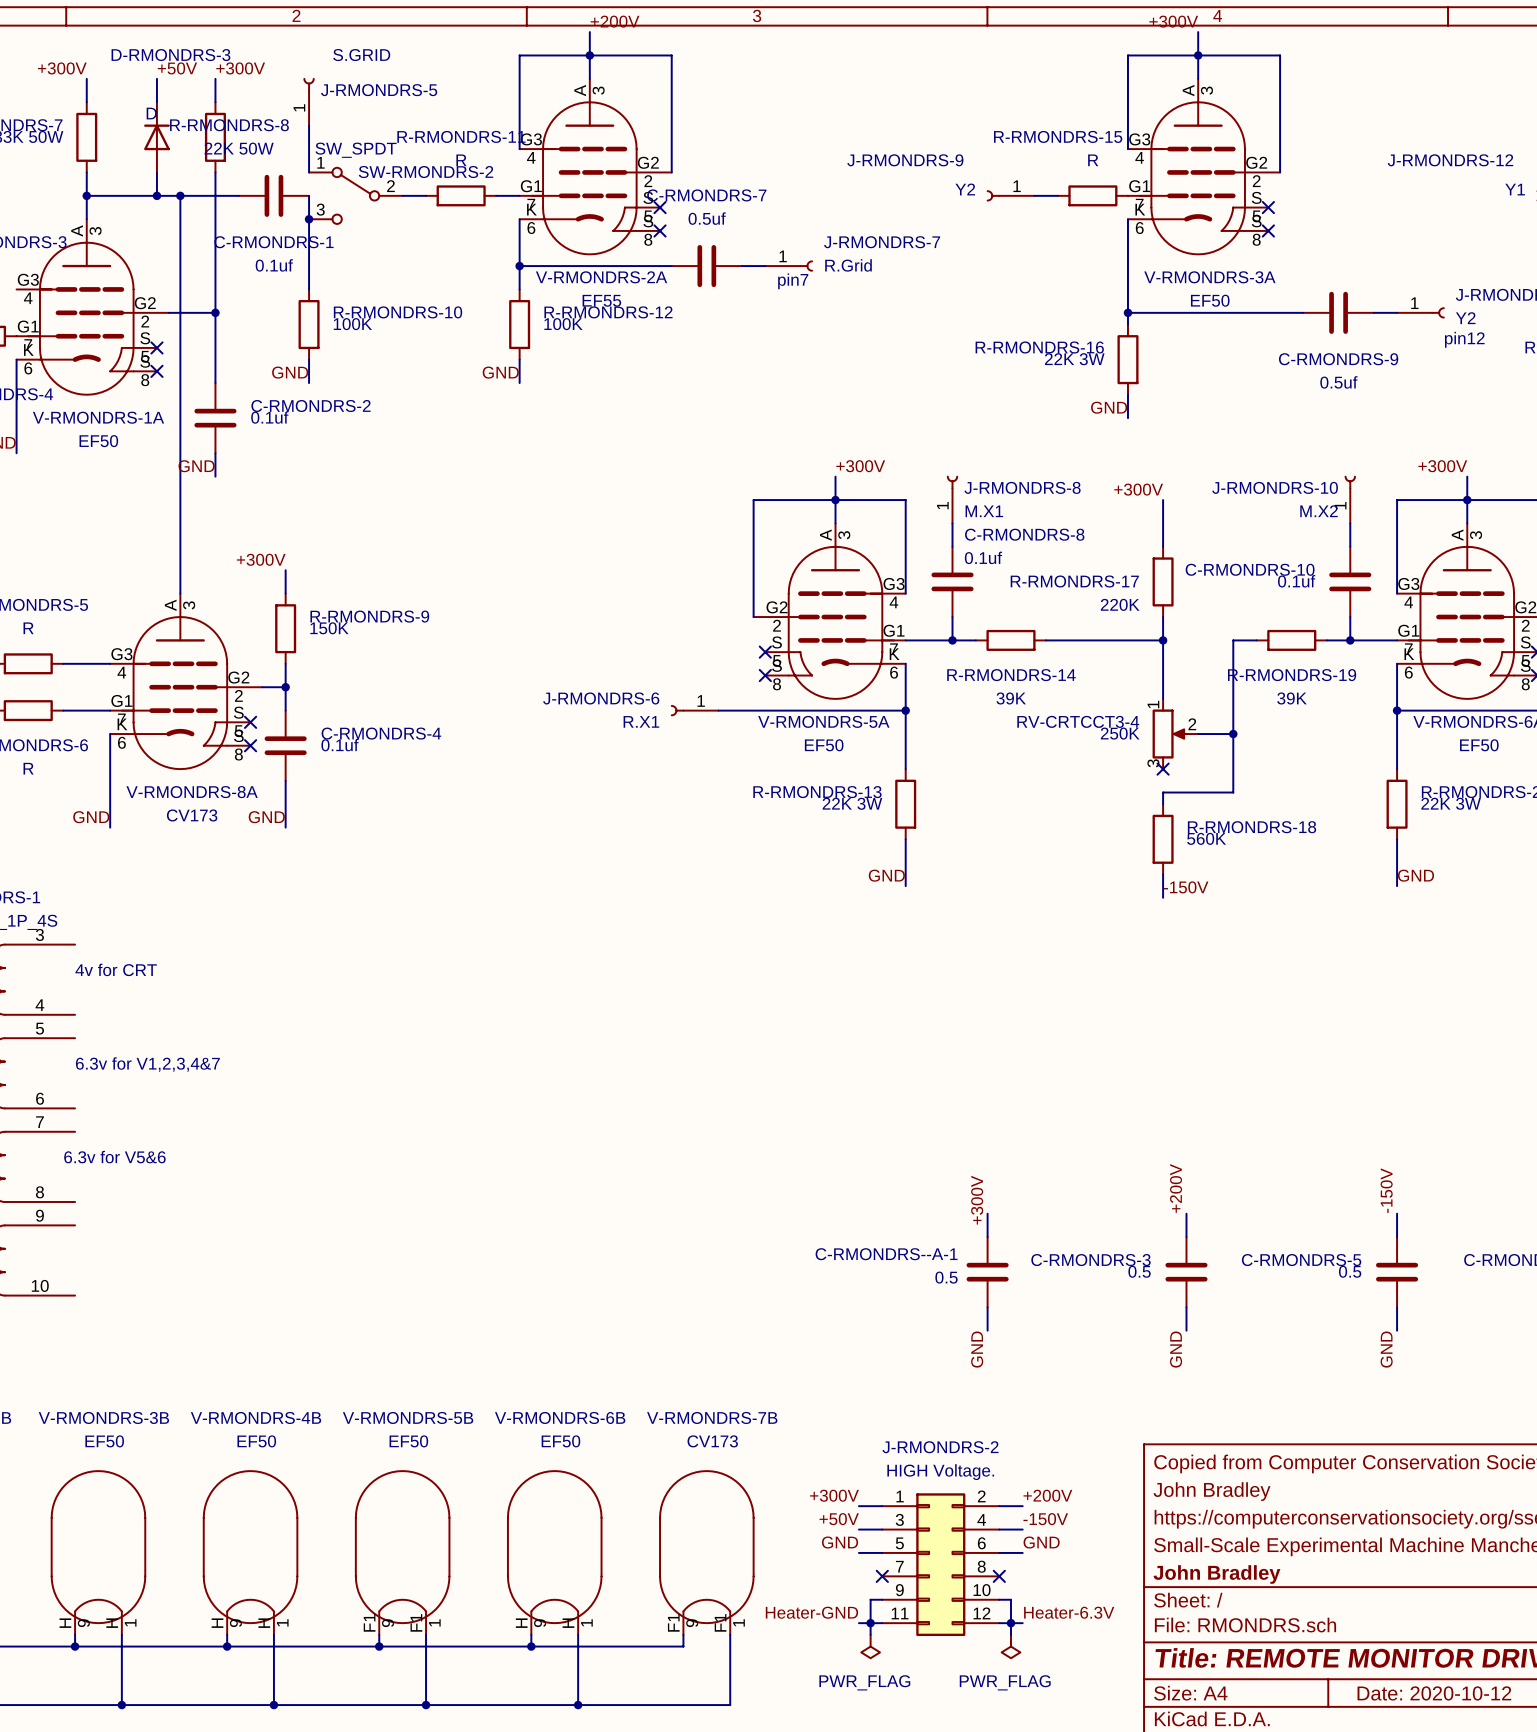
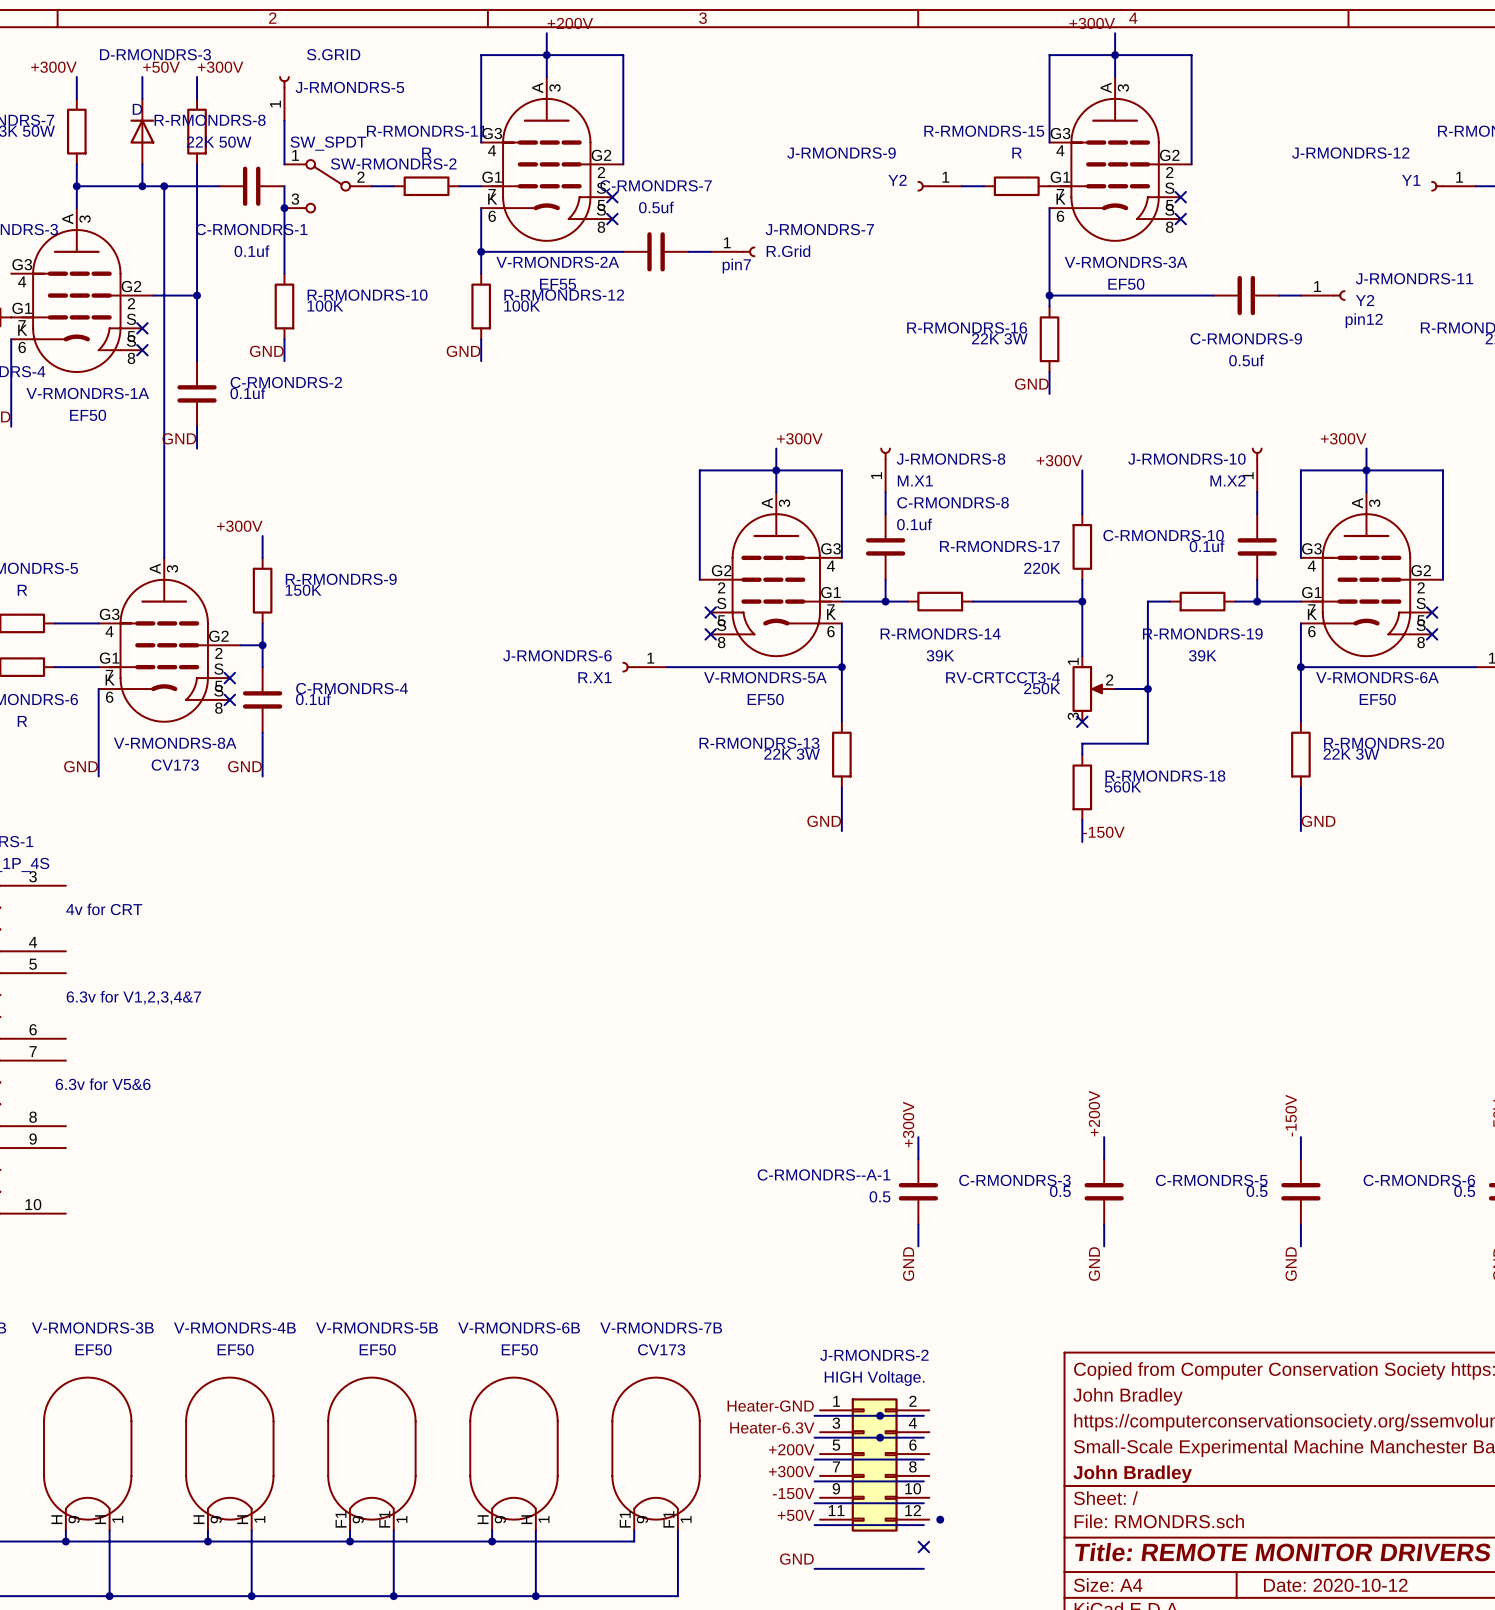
label position: +300V (834, 1495) -> +300V (791, 1471)
label position: +200V (1047, 1495) -> +200V (791, 1449)
wire: (858, 1506) (882, 1506) -> none
wire: (999, 1506) (1022, 1506) -> none
wire: none -> (814, 1415) (923, 1415)
junction: none -> (880, 1415)
label position: +50V (839, 1519) -> +50V (796, 1515)
label position: -150V (1045, 1519) -> -150V (793, 1493)
wire: (858, 1529) (882, 1529) -> none
wire: (999, 1529) (1022, 1529) -> none
wire: none -> (814, 1437) (923, 1437)
junction: none -> (880, 1437)
label: GND (840, 1542) -> none
label: GND (1041, 1542) -> none
wire: (858, 1552) (882, 1552) -> none
wire: (999, 1552) (1022, 1552) -> none
wire: none -> (814, 1459) (923, 1459)
no-connect mark: (882, 1576) -> none
no-connect mark: (999, 1576) -> none
wire: none -> (814, 1481) (923, 1481)
wire: (882, 1599) (870, 1599) (870, 1634) -> none
wire: (999, 1599) (1011, 1599) (1011, 1634) -> none
wire: none -> (814, 1503) (923, 1503)
label position: Heater-GND (811, 1612) -> Heater-GND (770, 1406)
label position: Heater-6.3V (1069, 1612) -> Heater-6.3V (772, 1427)
wire: (858, 1623) (882, 1623) -> none
junction: (870, 1623) -> none
wire: (999, 1623) (1022, 1623) -> none
wire: none -> (814, 1525) (923, 1525)
power symbol: PWR_FLAG (870, 1646) -> none
power symbol: PWR_FLAG (1011, 1646) -> none
no-connect mark: none -> (923, 1546)
label: none -> GND (796, 1559)
wire: none -> (814, 1568) (923, 1568)

